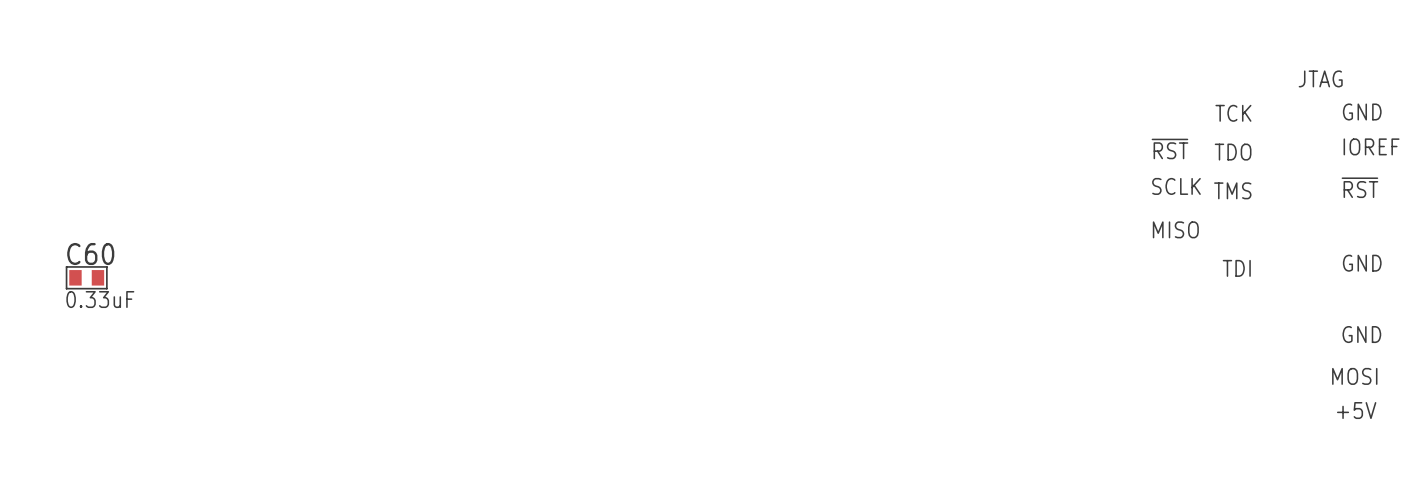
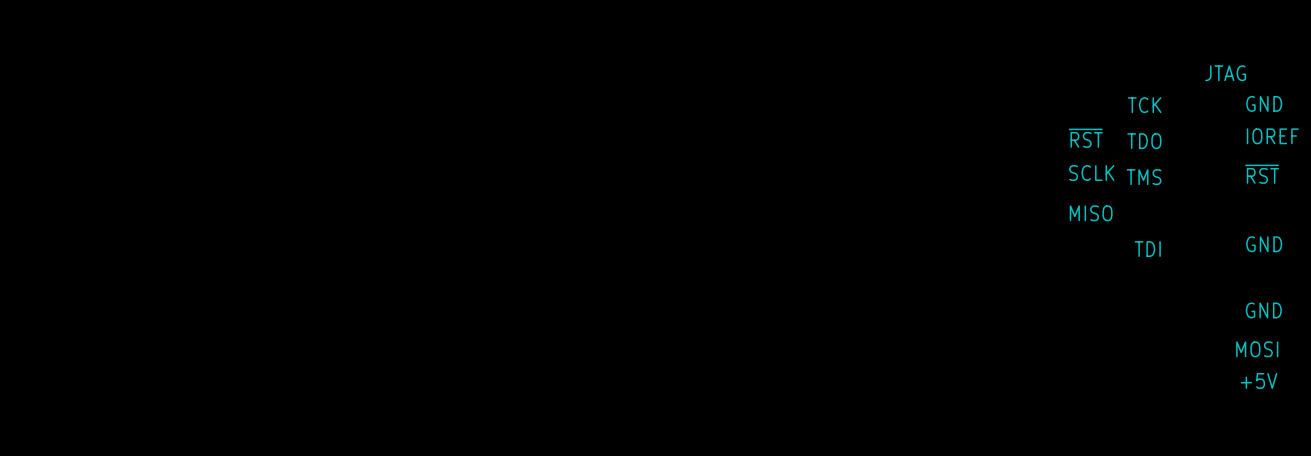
C60: 0.33uF (86, 277) -> none

